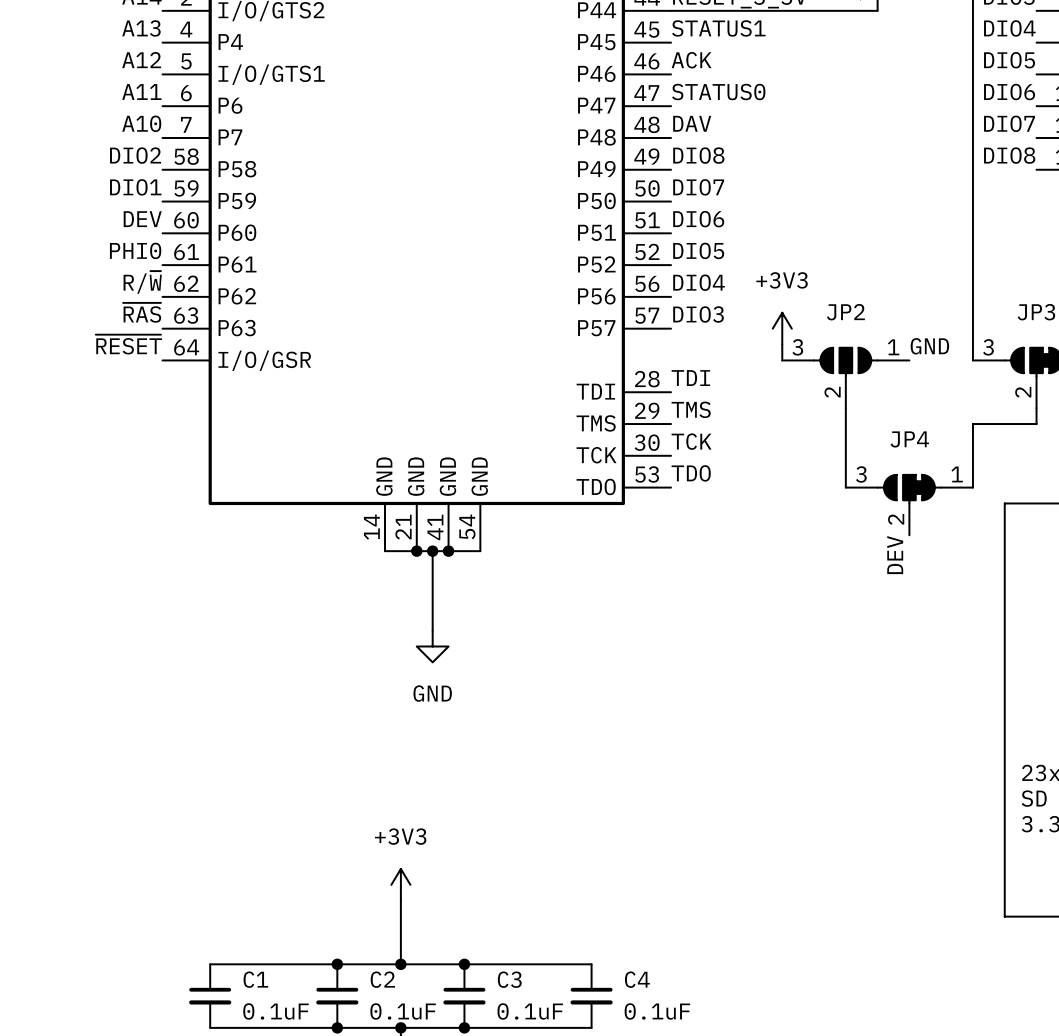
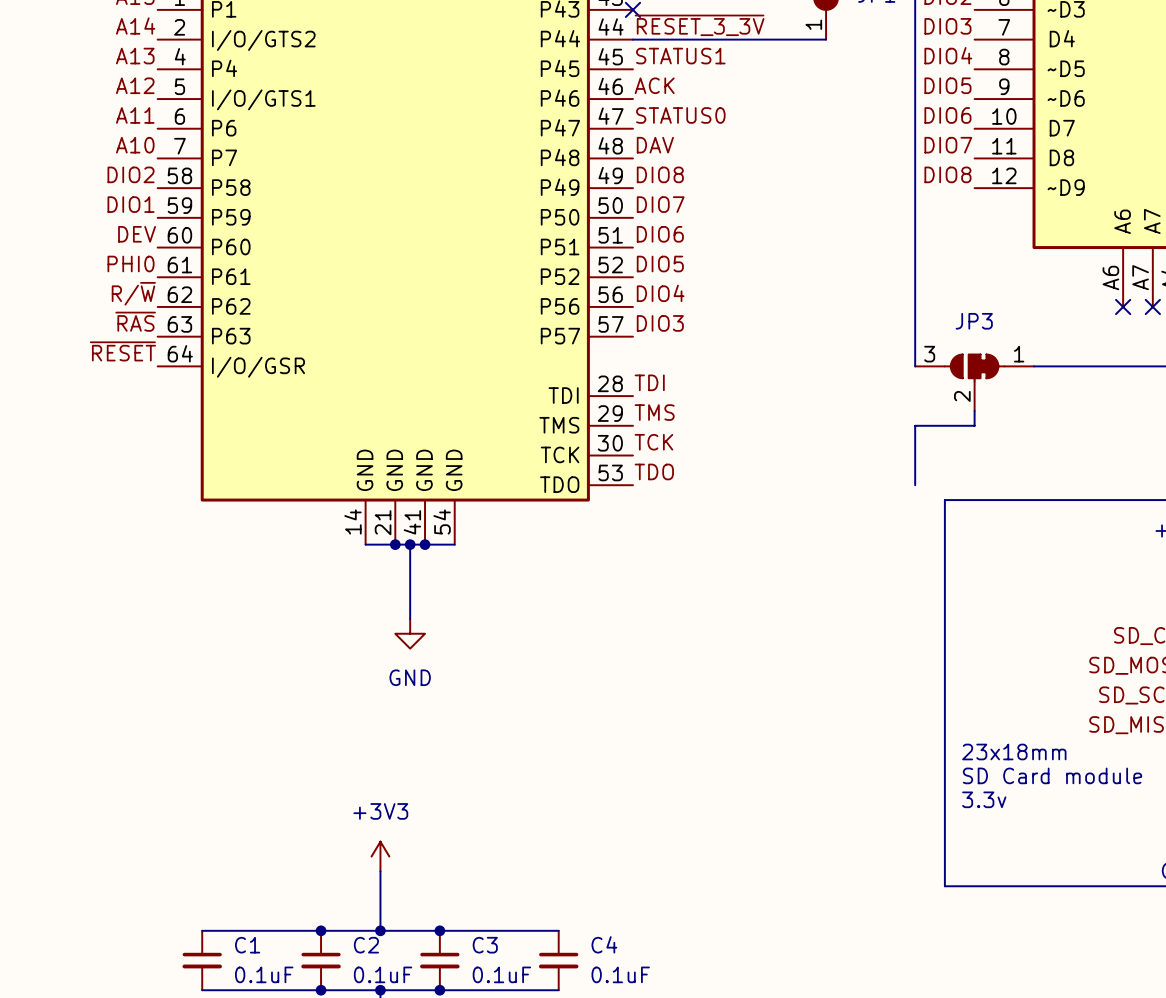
power symbol: +3V3 (782, 328) -> none
wire: (782, 344) (782, 360) -> none
label: GND (929, 346) -> none
JP2: (845, 377) -> none
wire: (845, 408) (845, 487) -> none
JP4: (909, 505) -> none
label: DEV (895, 555) -> none

